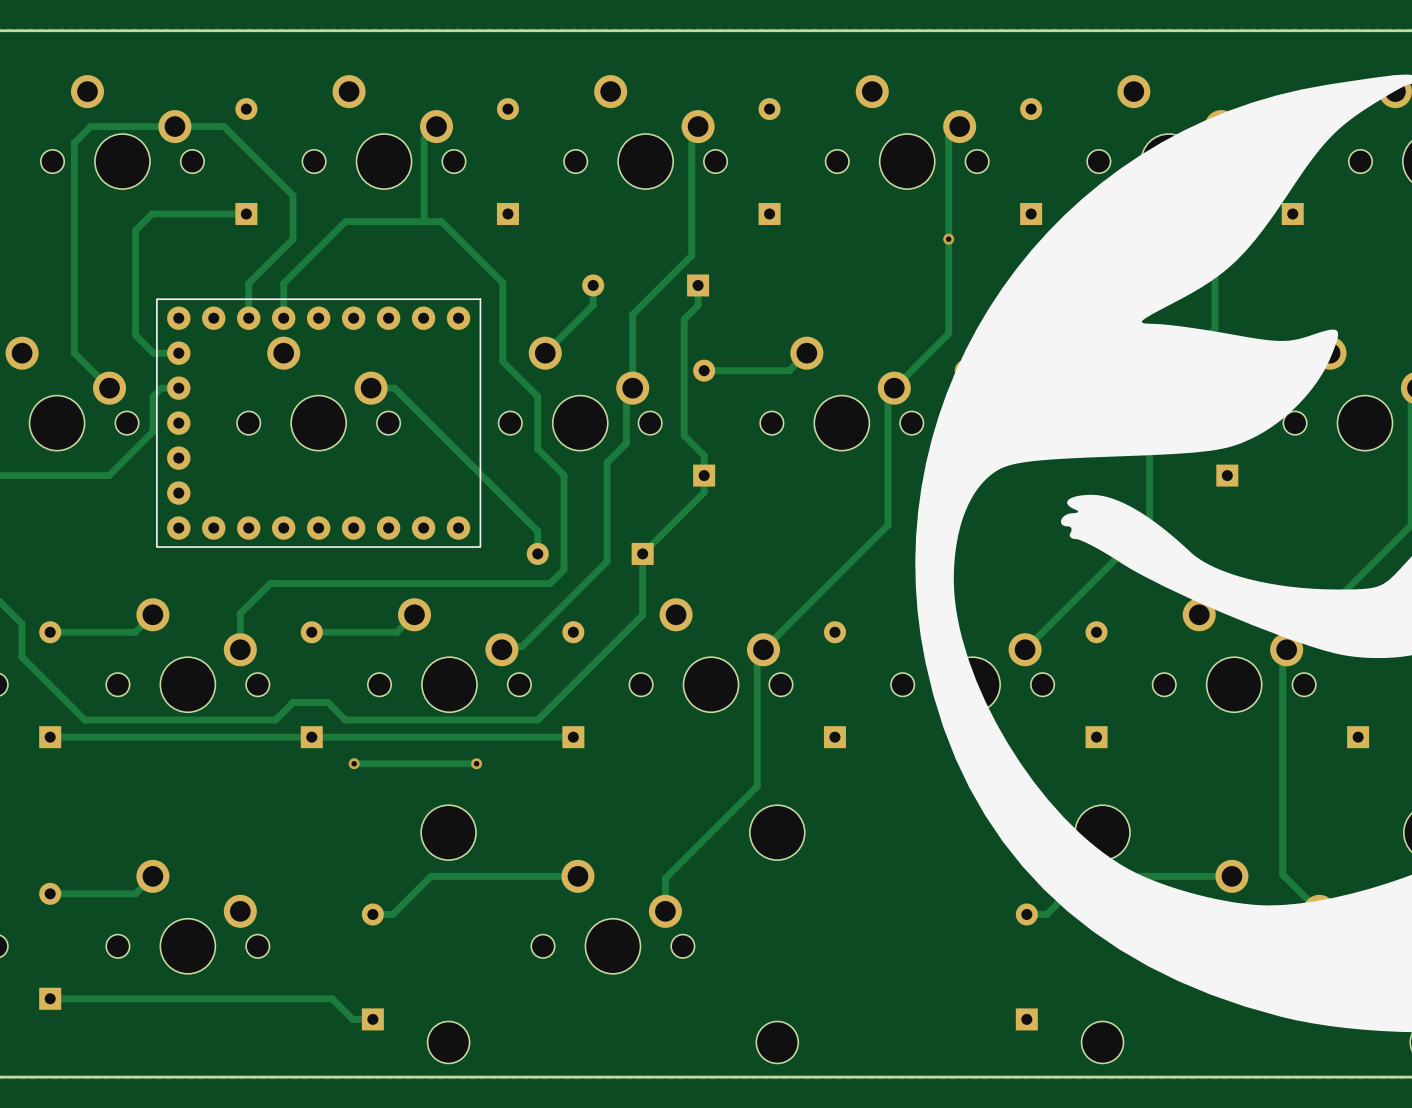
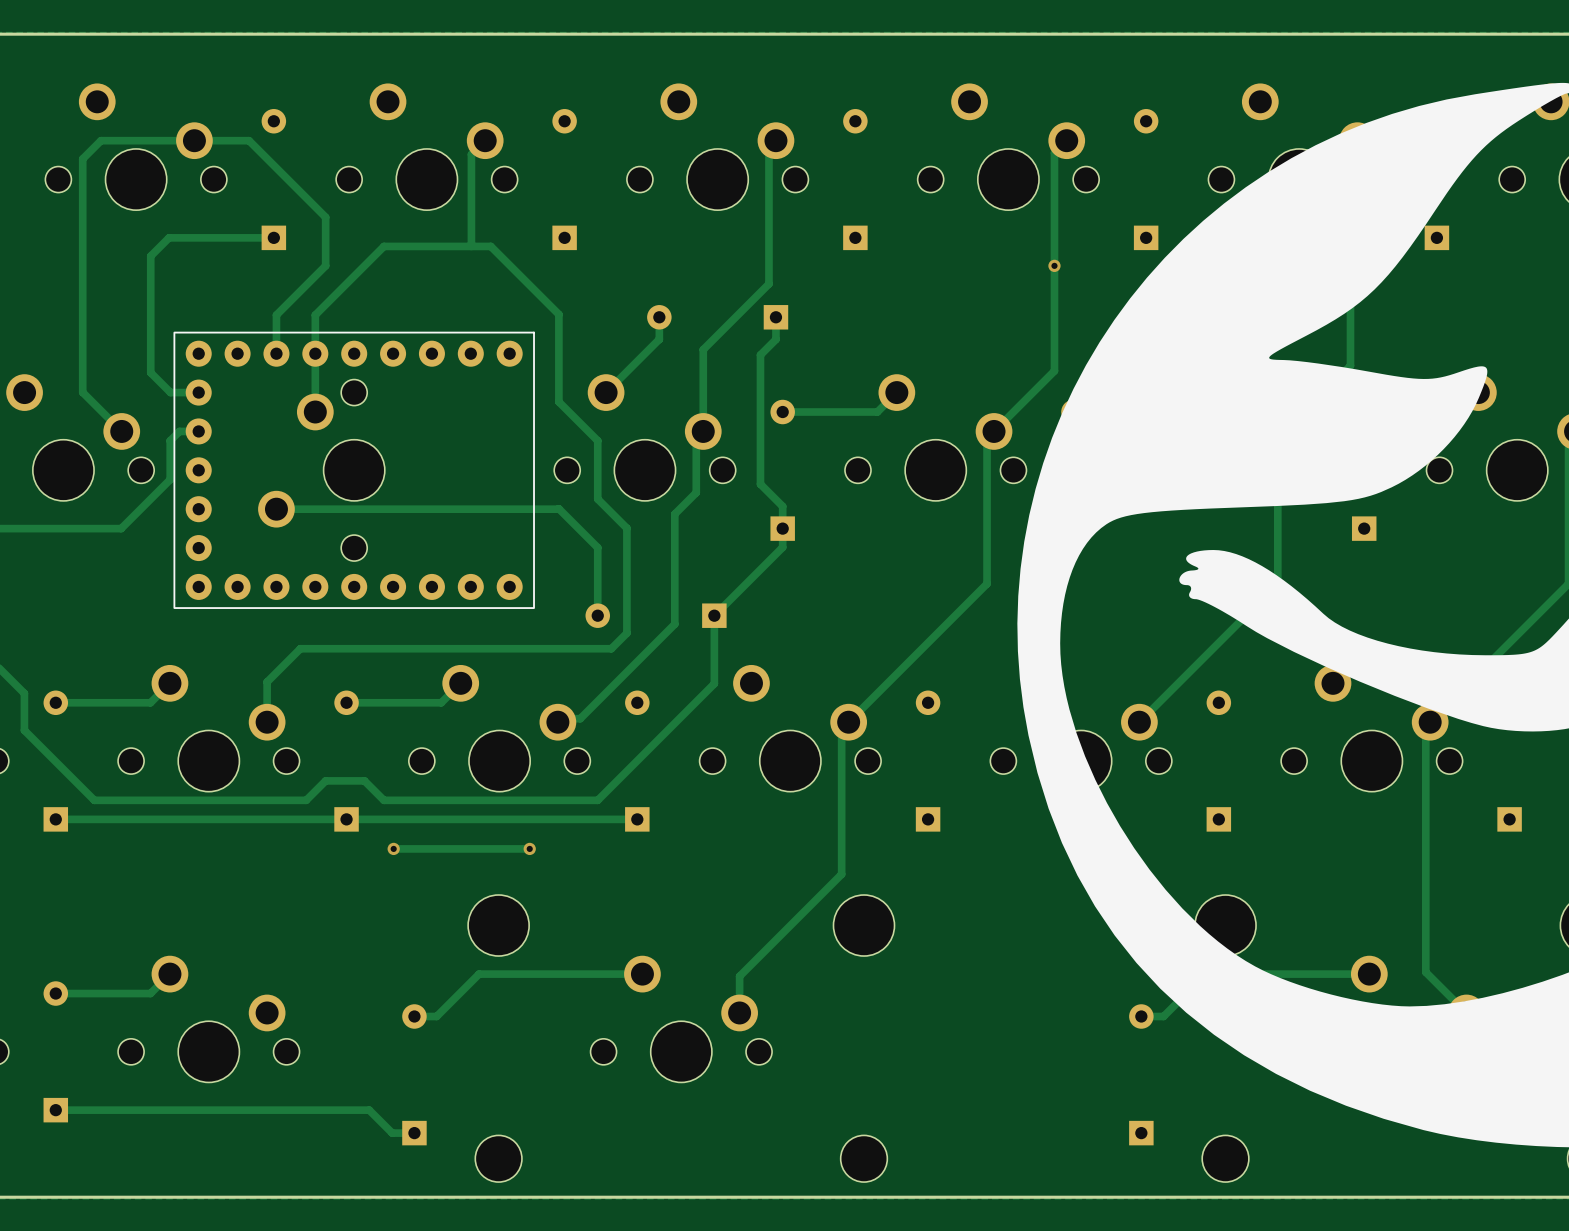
track: none -> (315, 353) (315, 412)
track: (371, 388) (394, 388) (537, 531) -> (276, 509) (558, 508) (597, 547) (597, 590)
part rotation: 0° (318, 393) -> 90° counterclockwise (321, 470)

